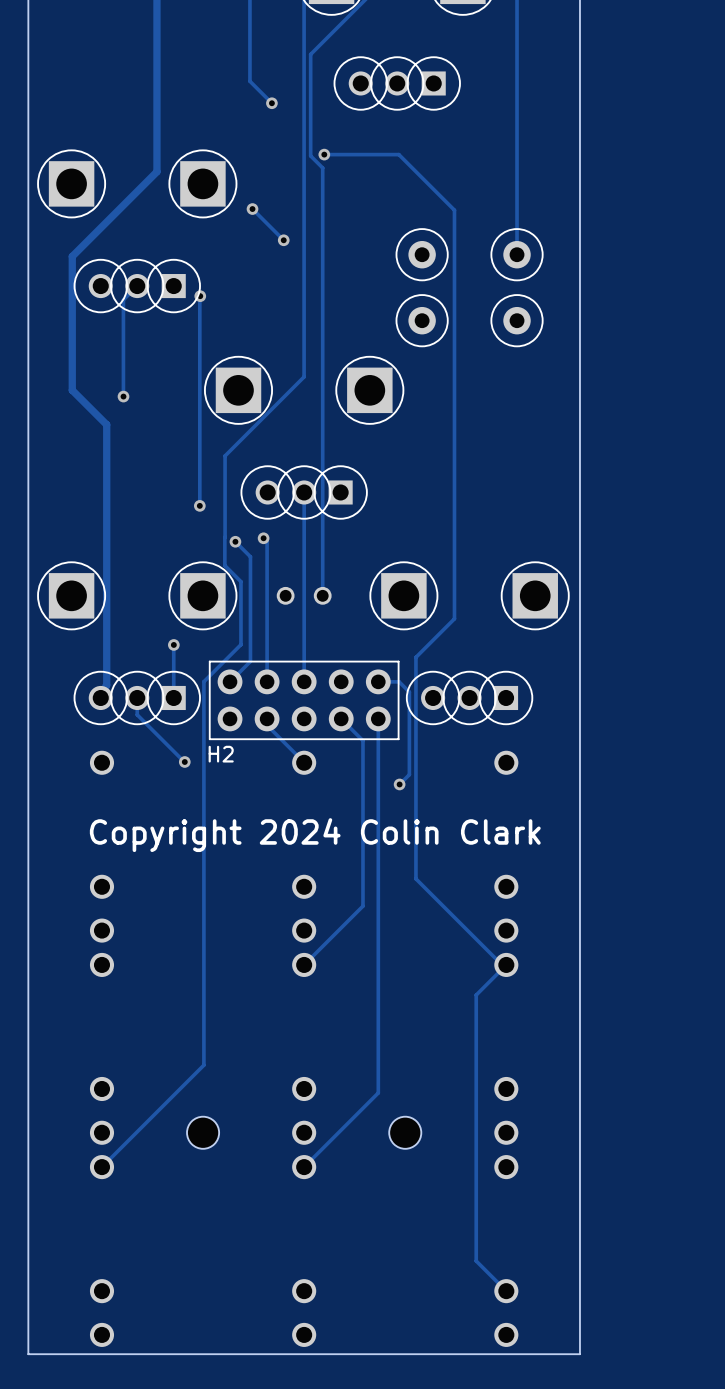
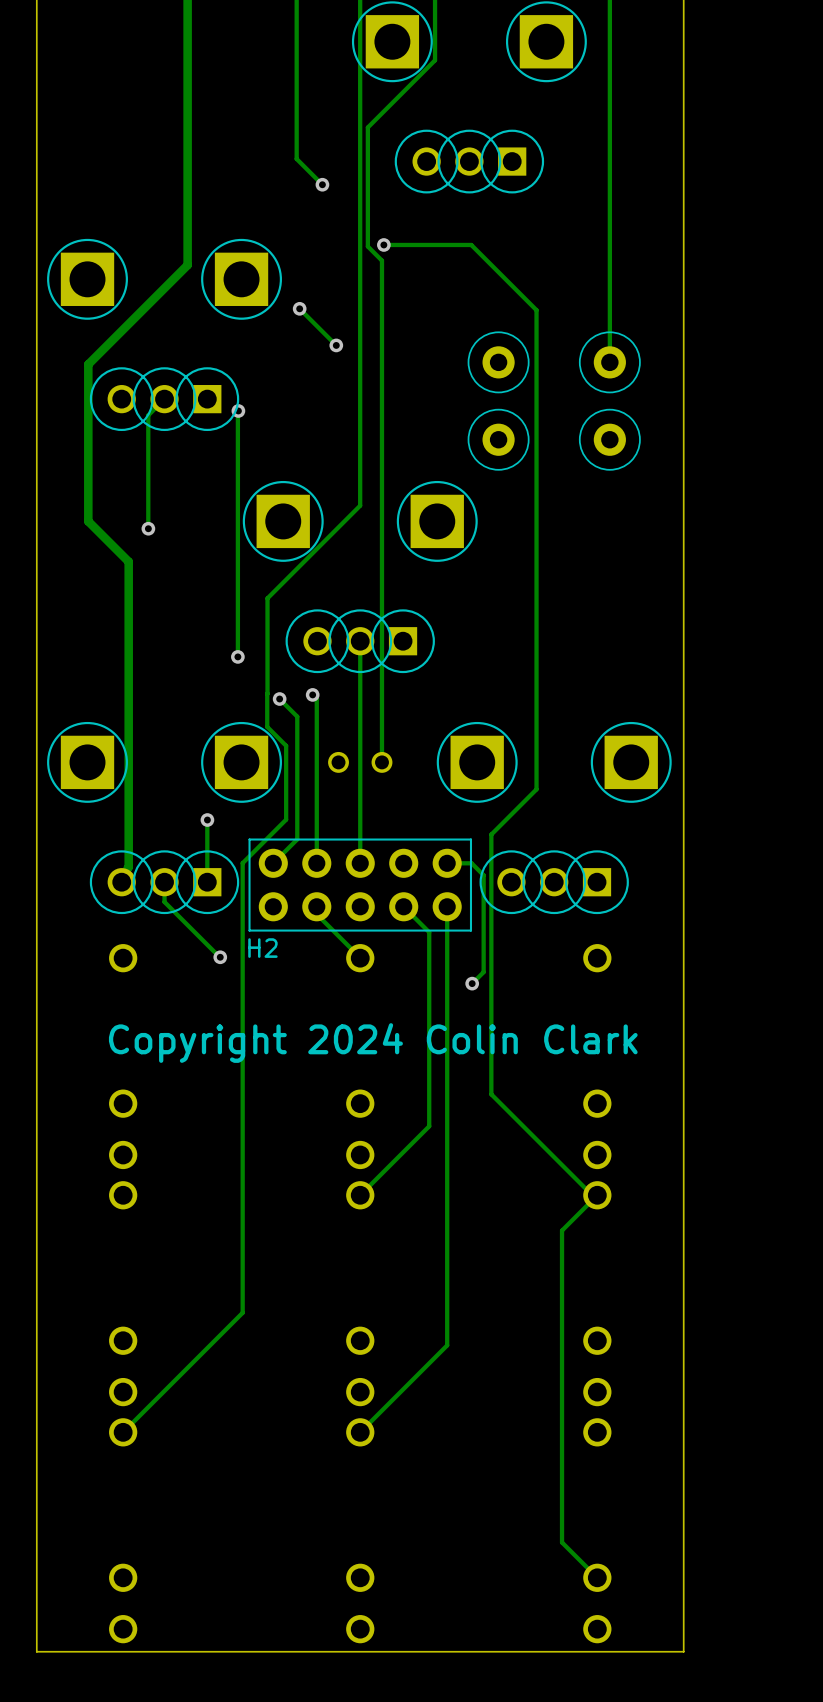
part: (203, 1132) -> none
part: (405, 1132) -> none

